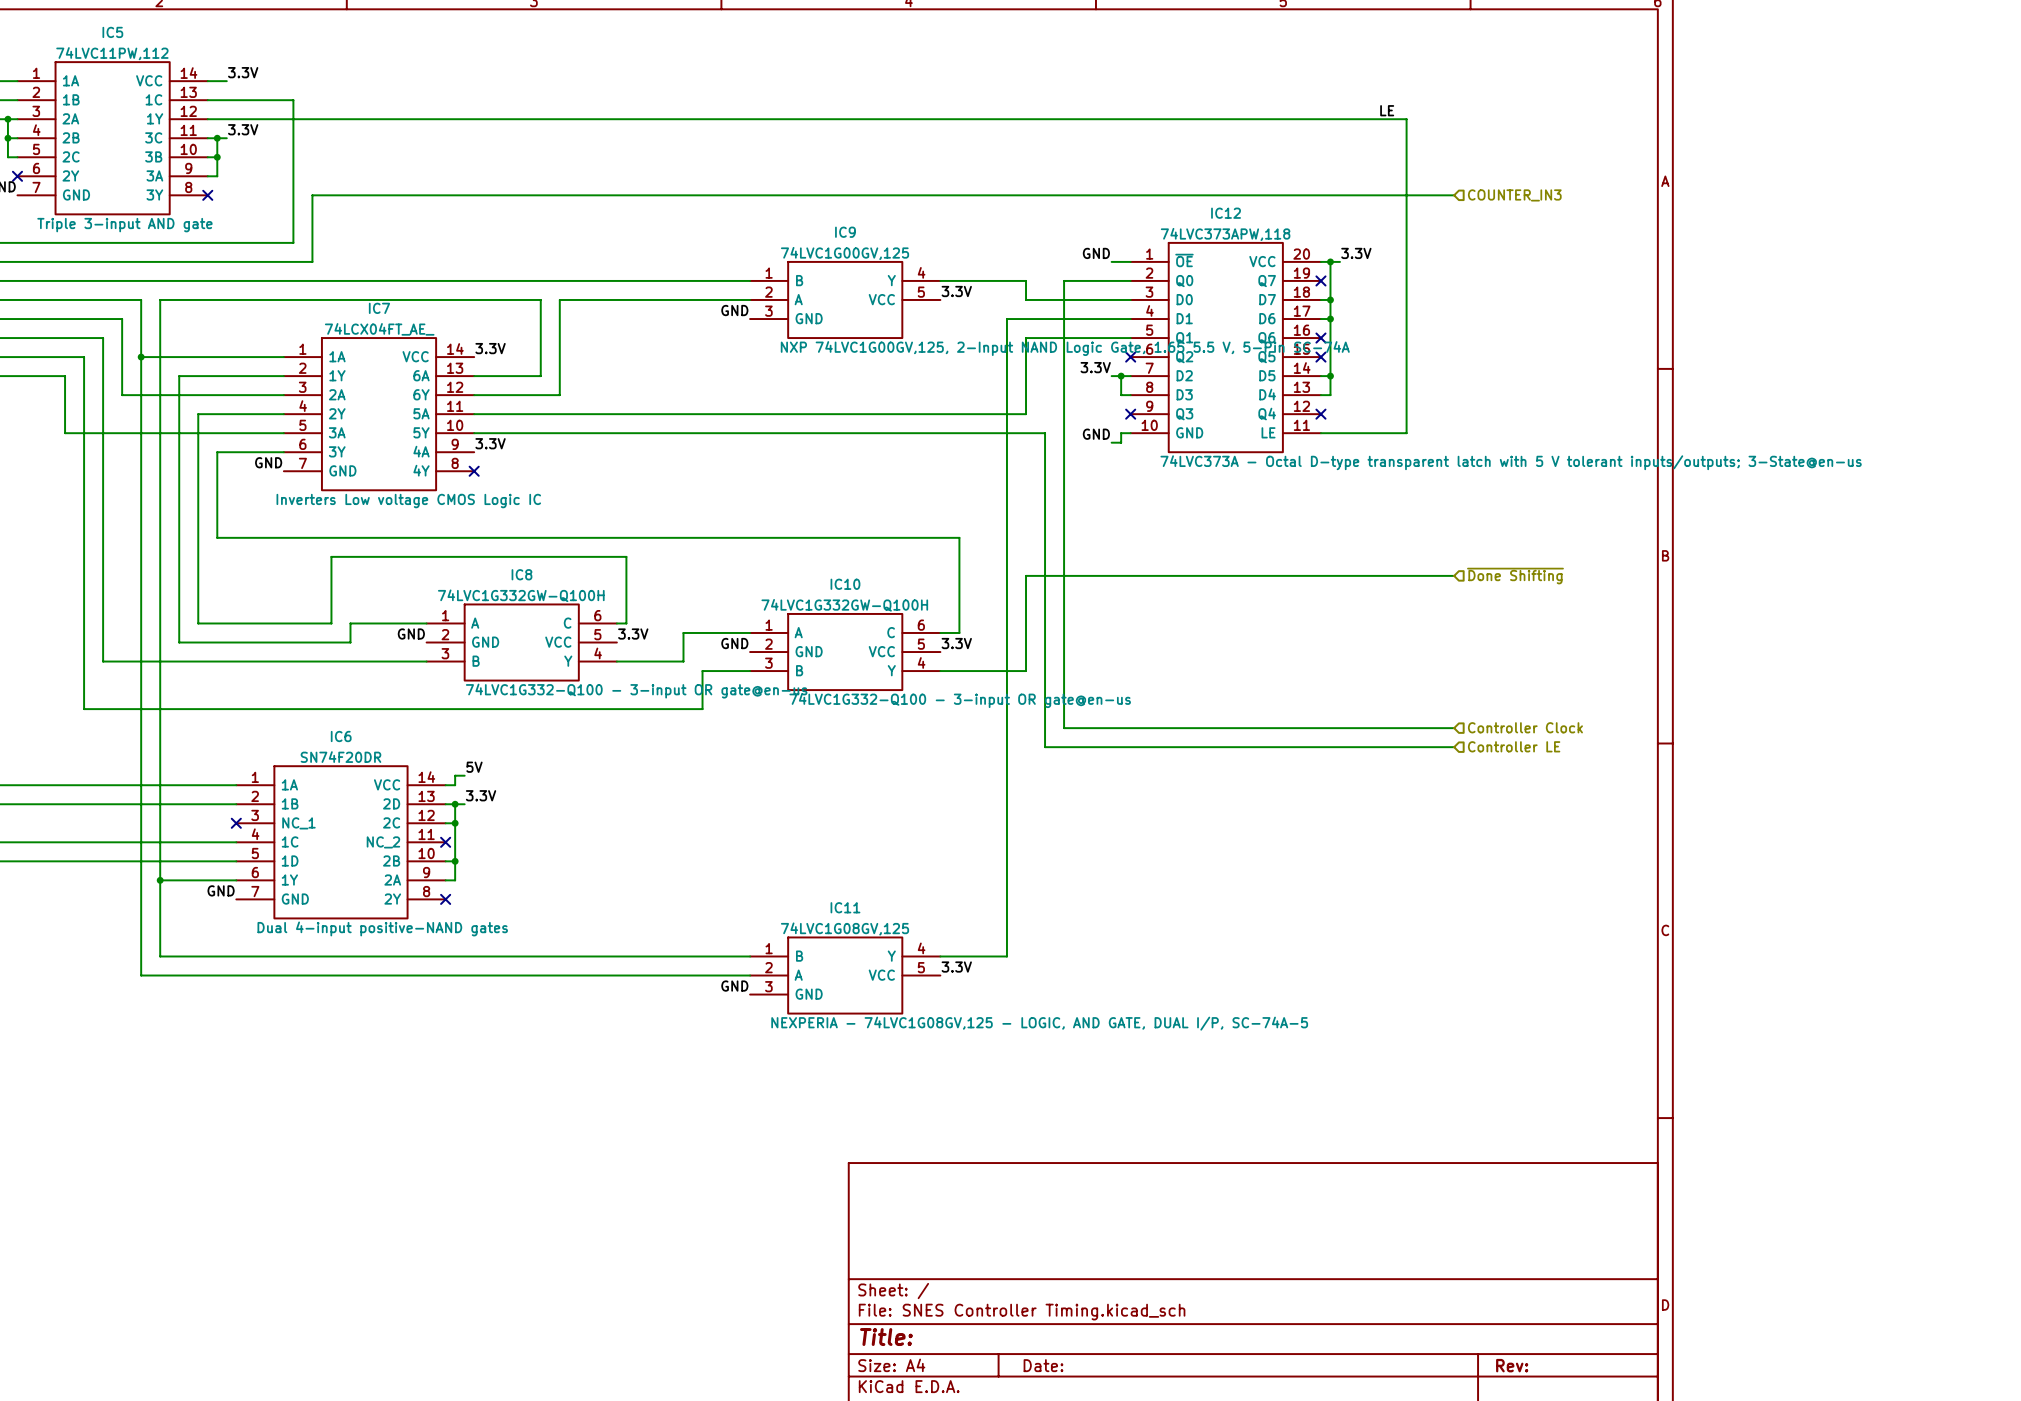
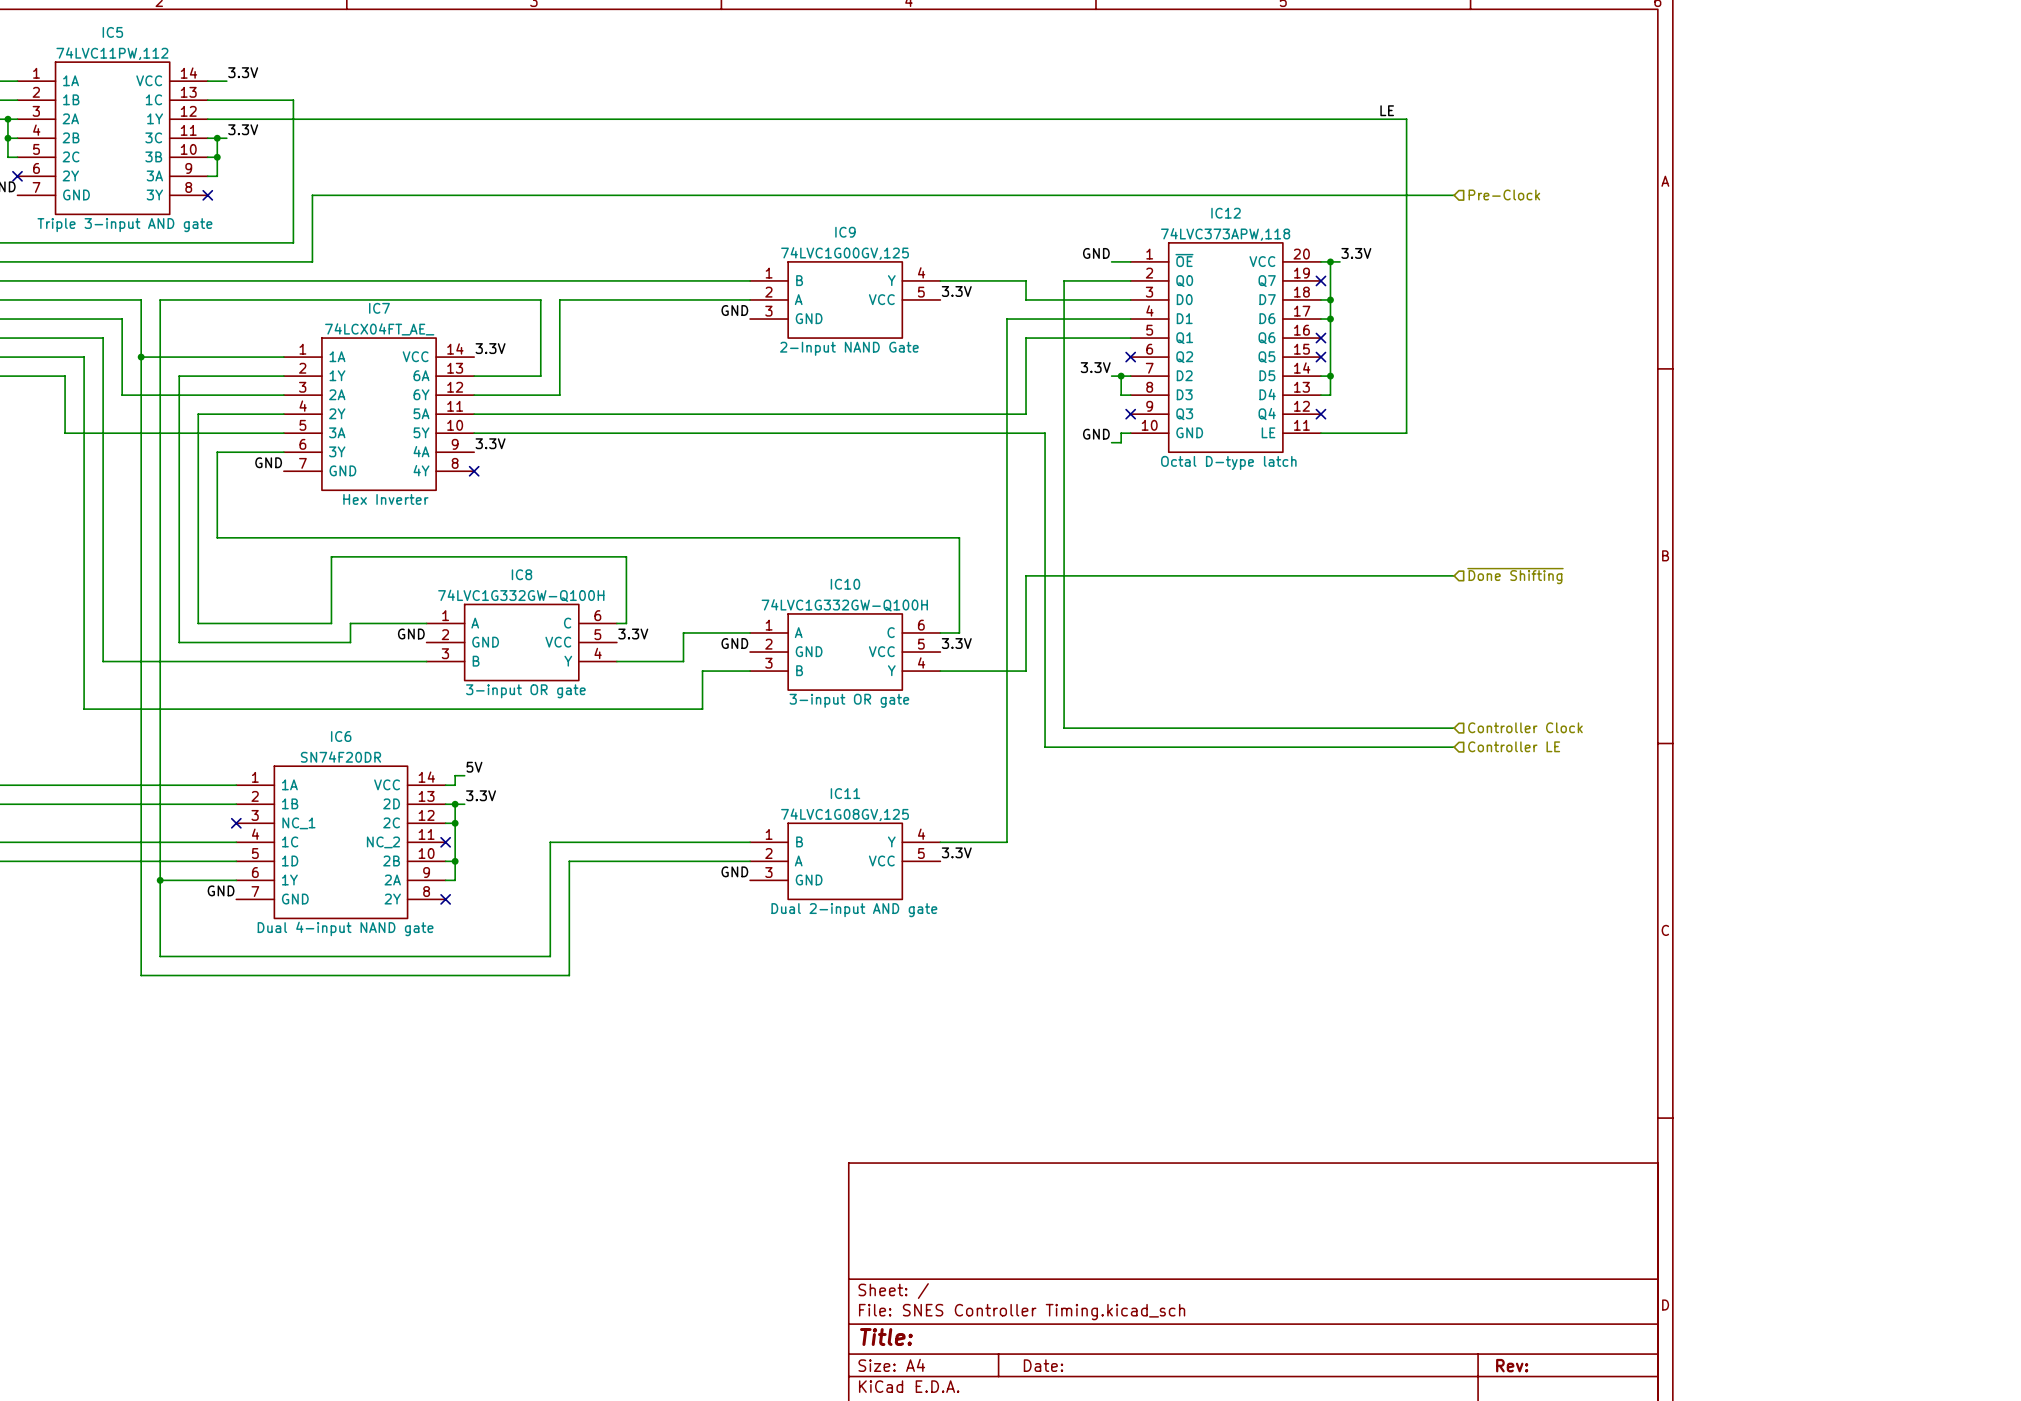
hierarchical label: COUNTER_IN3 (1514, 195) -> Pre-Clock (1504, 194)
IC9 text: NXP 74LVC1G00GV,125, 2-Input NAND Logic Gate, 1.65 5.5 V, 5-Pin SC-74A (1065, 348) -> 2-Input NAND Gate (849, 348)
IC12 text: 74LVC373A - Octal D-type transparent latch with 5 V tolerant inputs/outputs; 3-State@en-us (1511, 462) -> Octal D-type latch (1228, 462)
IC7 text: Inverters Low voltage CMOS Logic IC (408, 501) -> Hex Inverter (385, 499)
IC8 text: 74LVC1G332-Q100 - 3-input OR gate@en-us (636, 691) -> 3-input OR gate (525, 691)
IC10 text: 74LVC1G332-Q100 - 3-input OR gate@en-us (960, 700) -> 3-input OR gate (849, 700)
wire: (1006, 842) (1006, 956) (940, 956) -> (1006, 842) (940, 842)
IC6 text: Dual 4-input positive-NAND gates (382, 928) -> Dual 4-input NAND gate (345, 928)
wire: (550, 956) (750, 956) -> (550, 956) (550, 842) (750, 842)
label position: 3.3V (956, 967) -> 3.3V (956, 852)
wire: (569, 975) (750, 975) -> (569, 975) (569, 861) (750, 861)
IC11 position: (845, 975) -> (845, 861)
label position: GND (734, 986) -> GND (734, 871)
IC11 text: NEXPERIA - 74LVC1G08GV,125 - LOGIC, AND GATE, DUAL I/P, SC-74A-5 (1039, 1023) -> Dual 2-input AND gate (854, 910)

